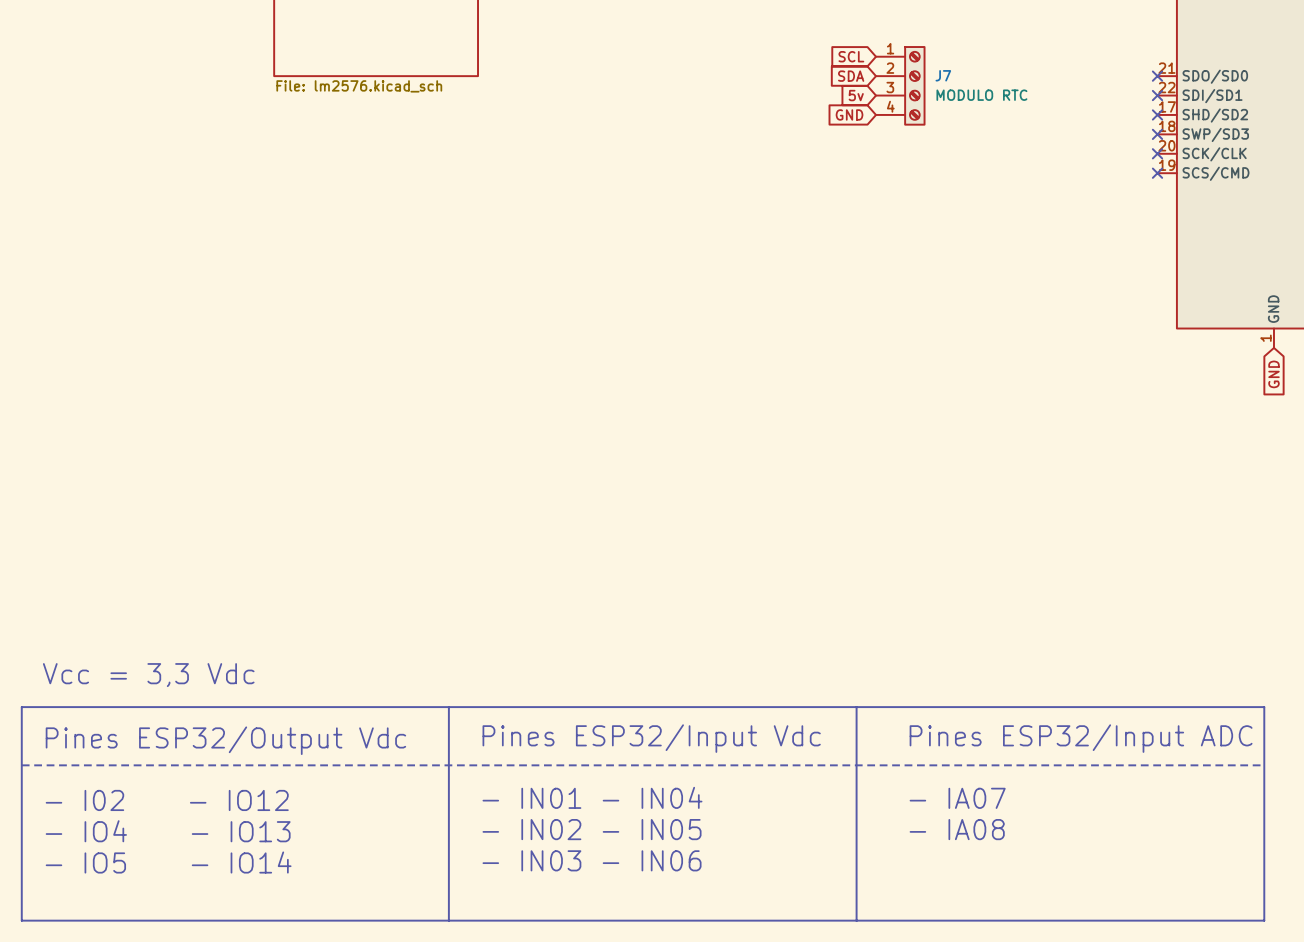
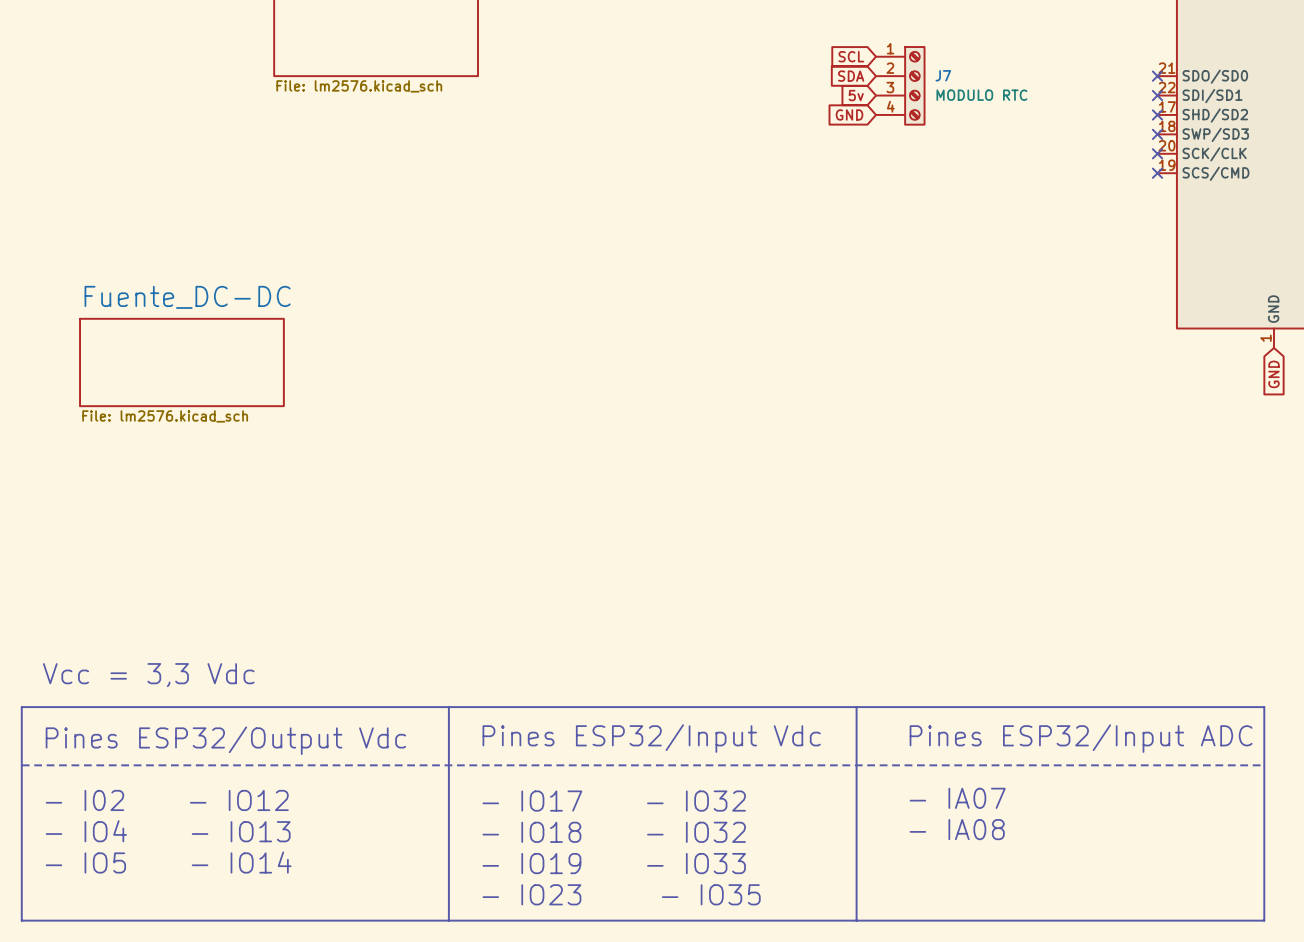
sheet Fuente_DC-DC: none -> File: lm2576.kicad_sch (181, 362)
text: - IN01 - IN04 (592, 797) -> - IO17 - IO32 (614, 801)
text: - IN02 - IN05 (592, 829) -> - IO18 - IO32 (614, 832)
text: - IN03 - IN06 (592, 860) -> - IO19 - IO33 (614, 863)
text: none -> - IO23 - IO35 (621, 894)

